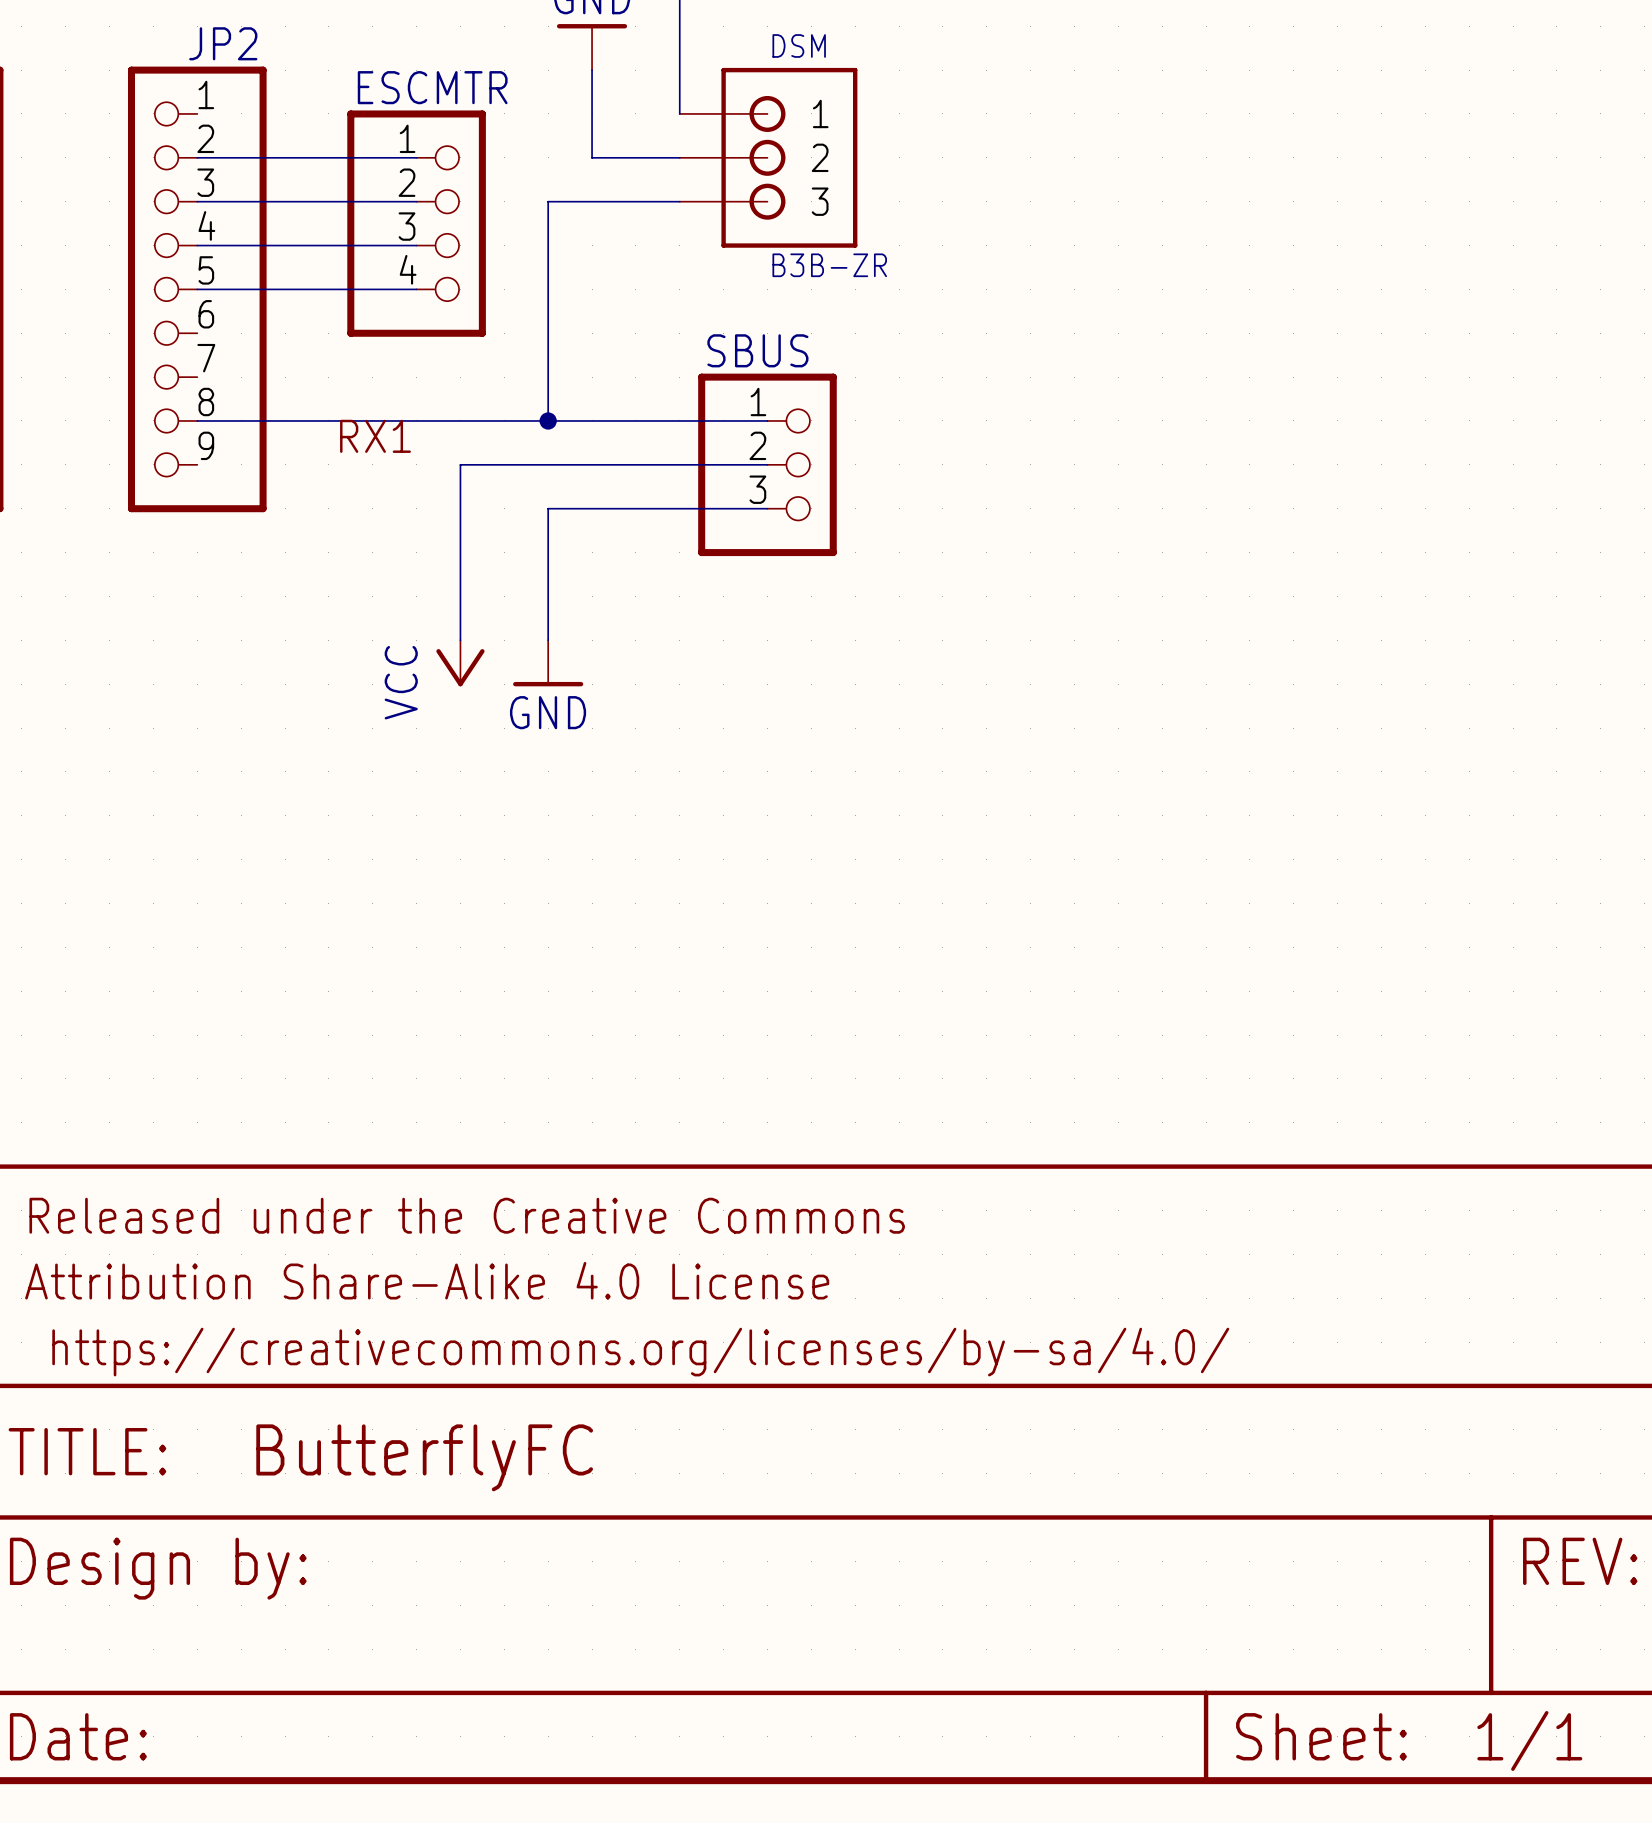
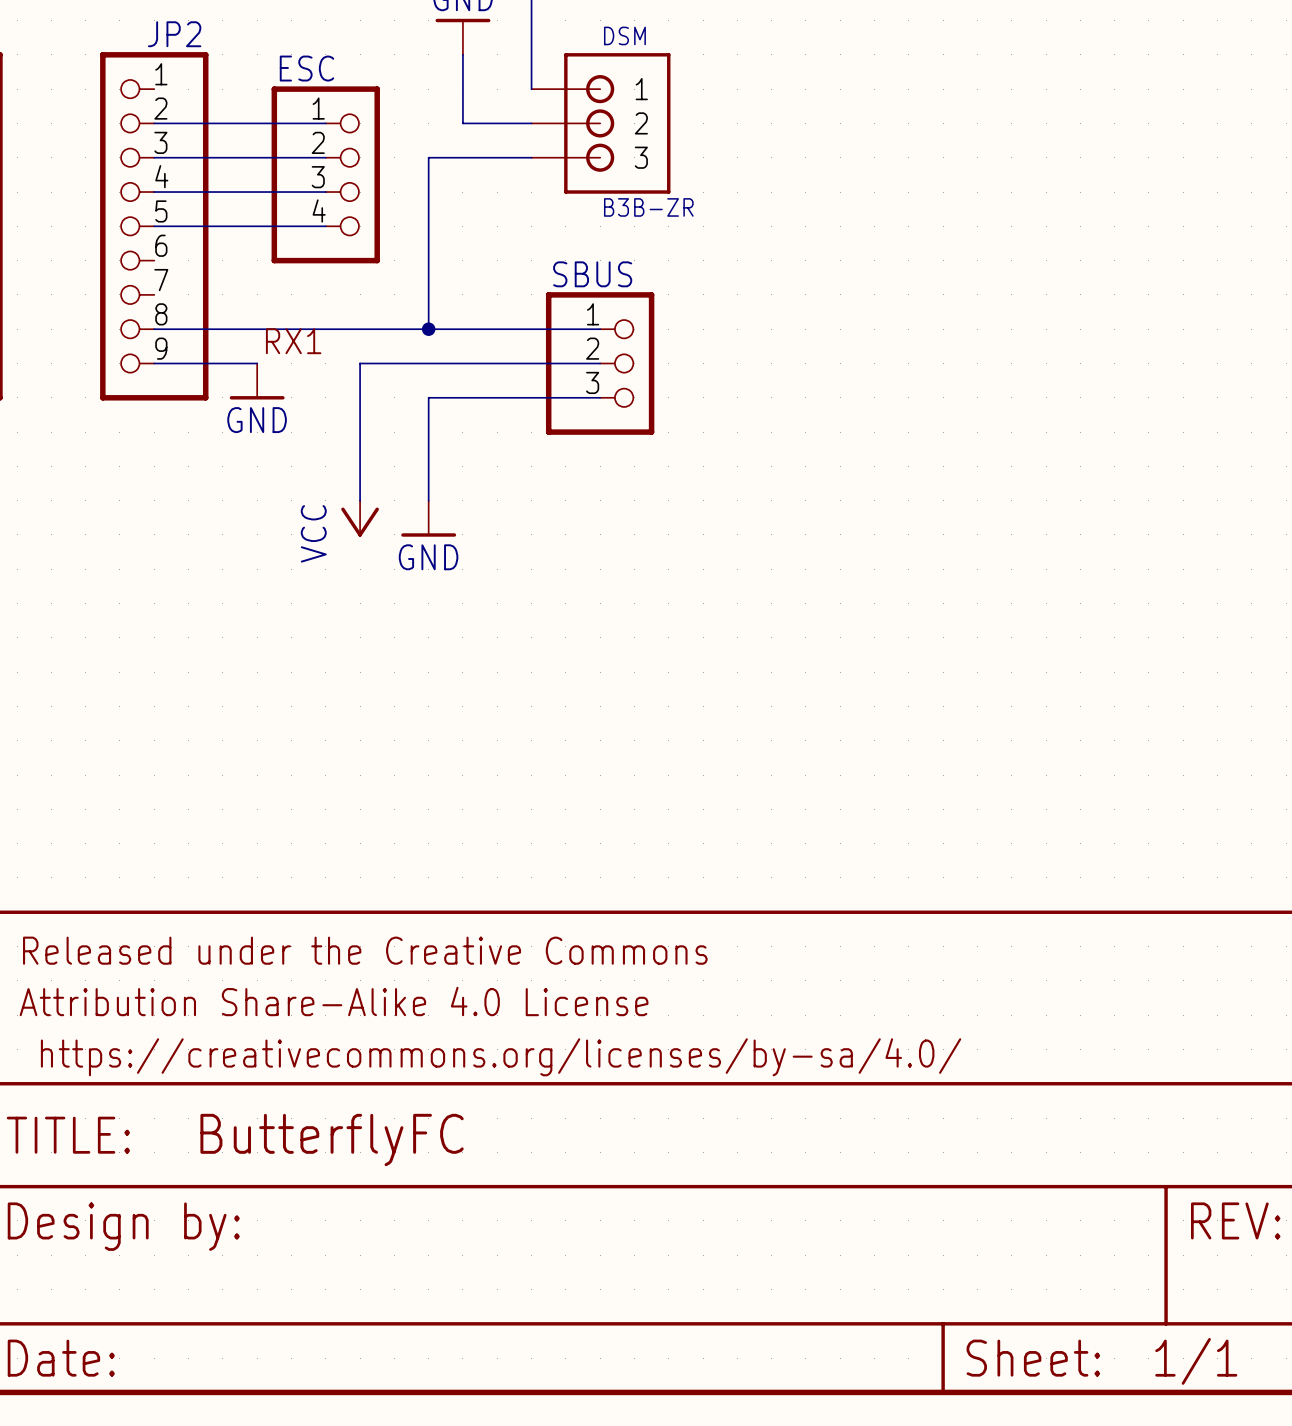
ESCMTR name: ESCMTR (432, 87) -> ESC (306, 68)
wire: none -> (154, 363) (257, 363)
power symbol: none -> GND (257, 381)

